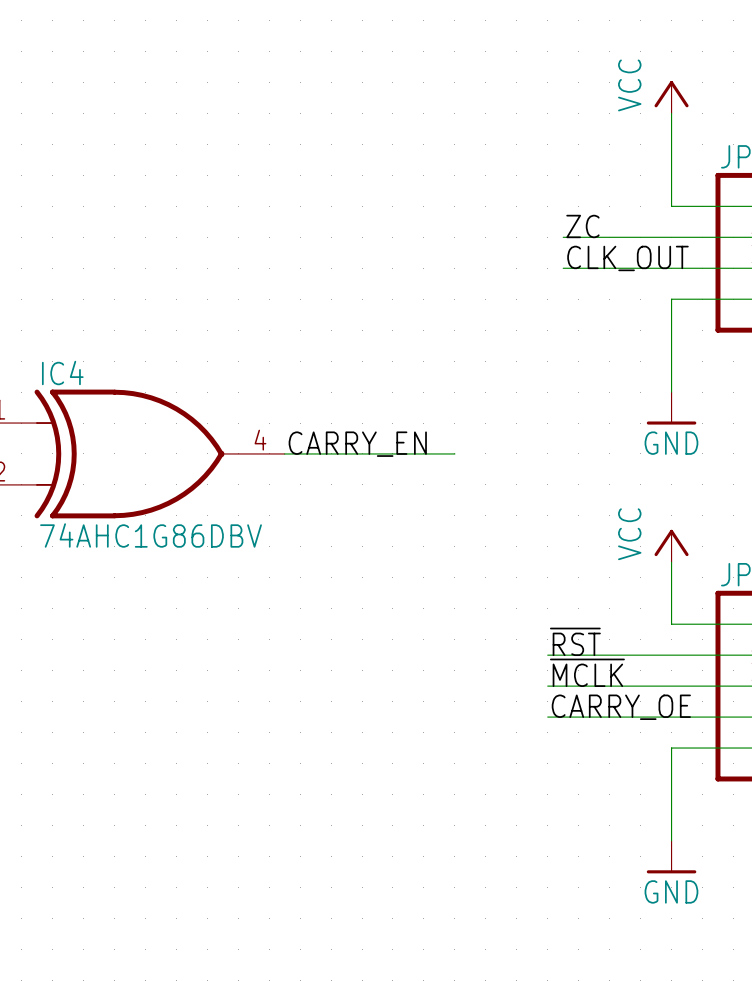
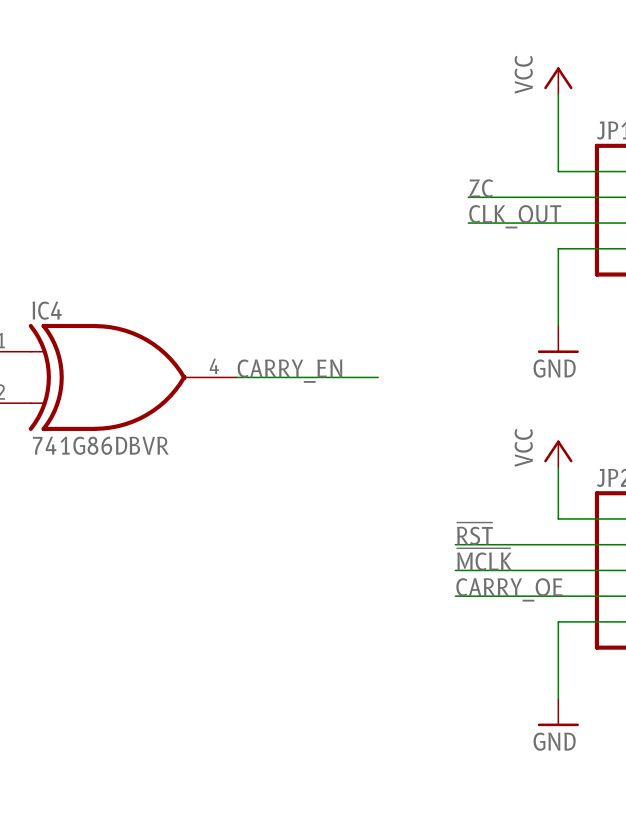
IC4 value: 74AHC1G86DBV (151, 535) -> 741G86DBVR (100, 445)

